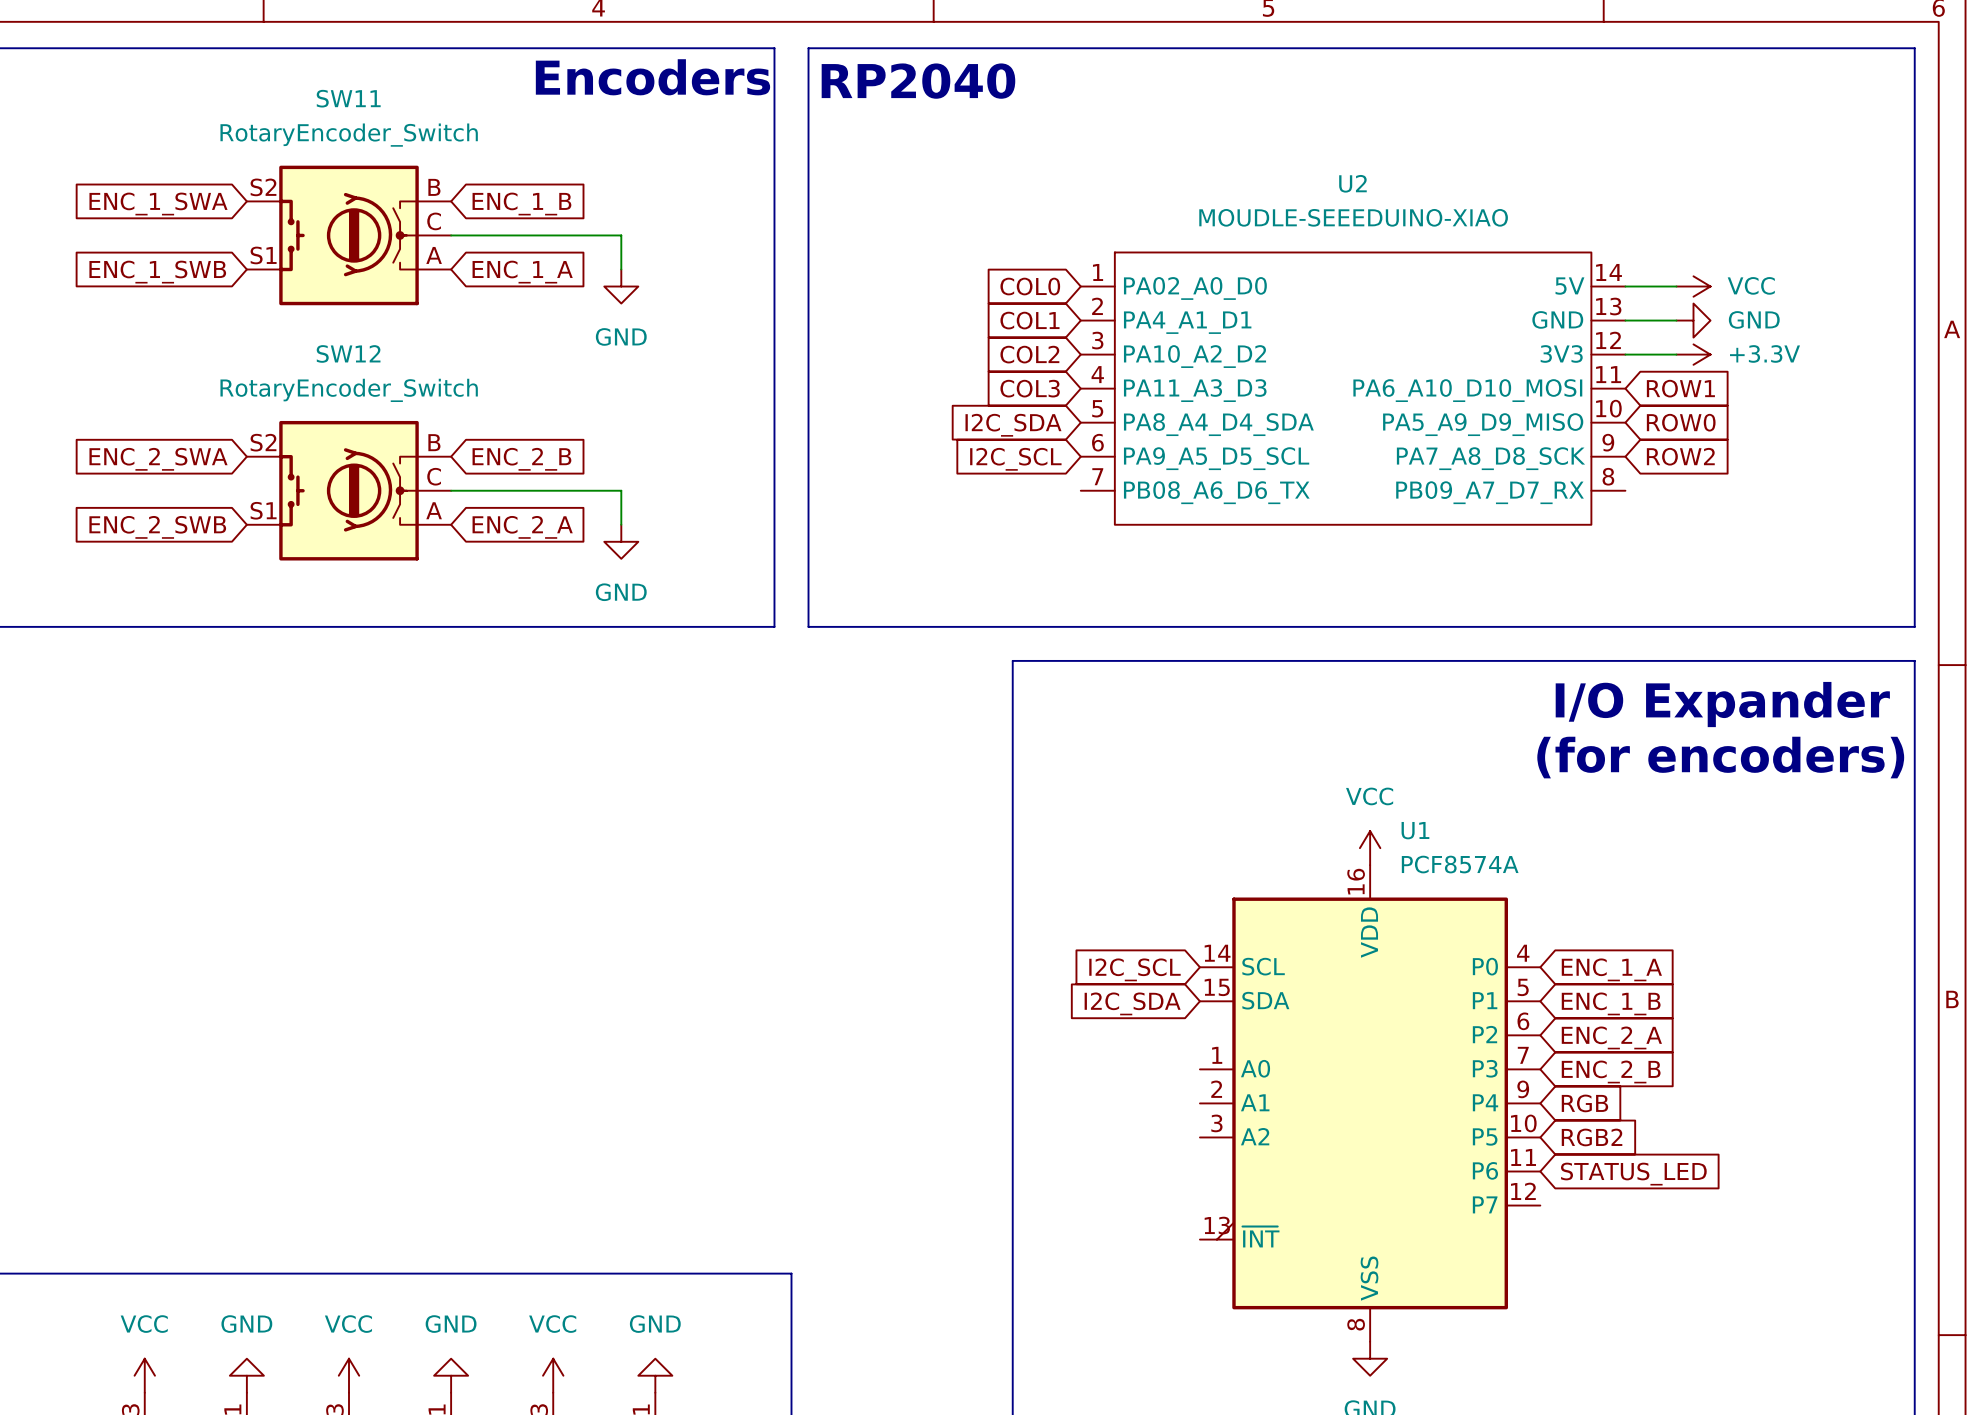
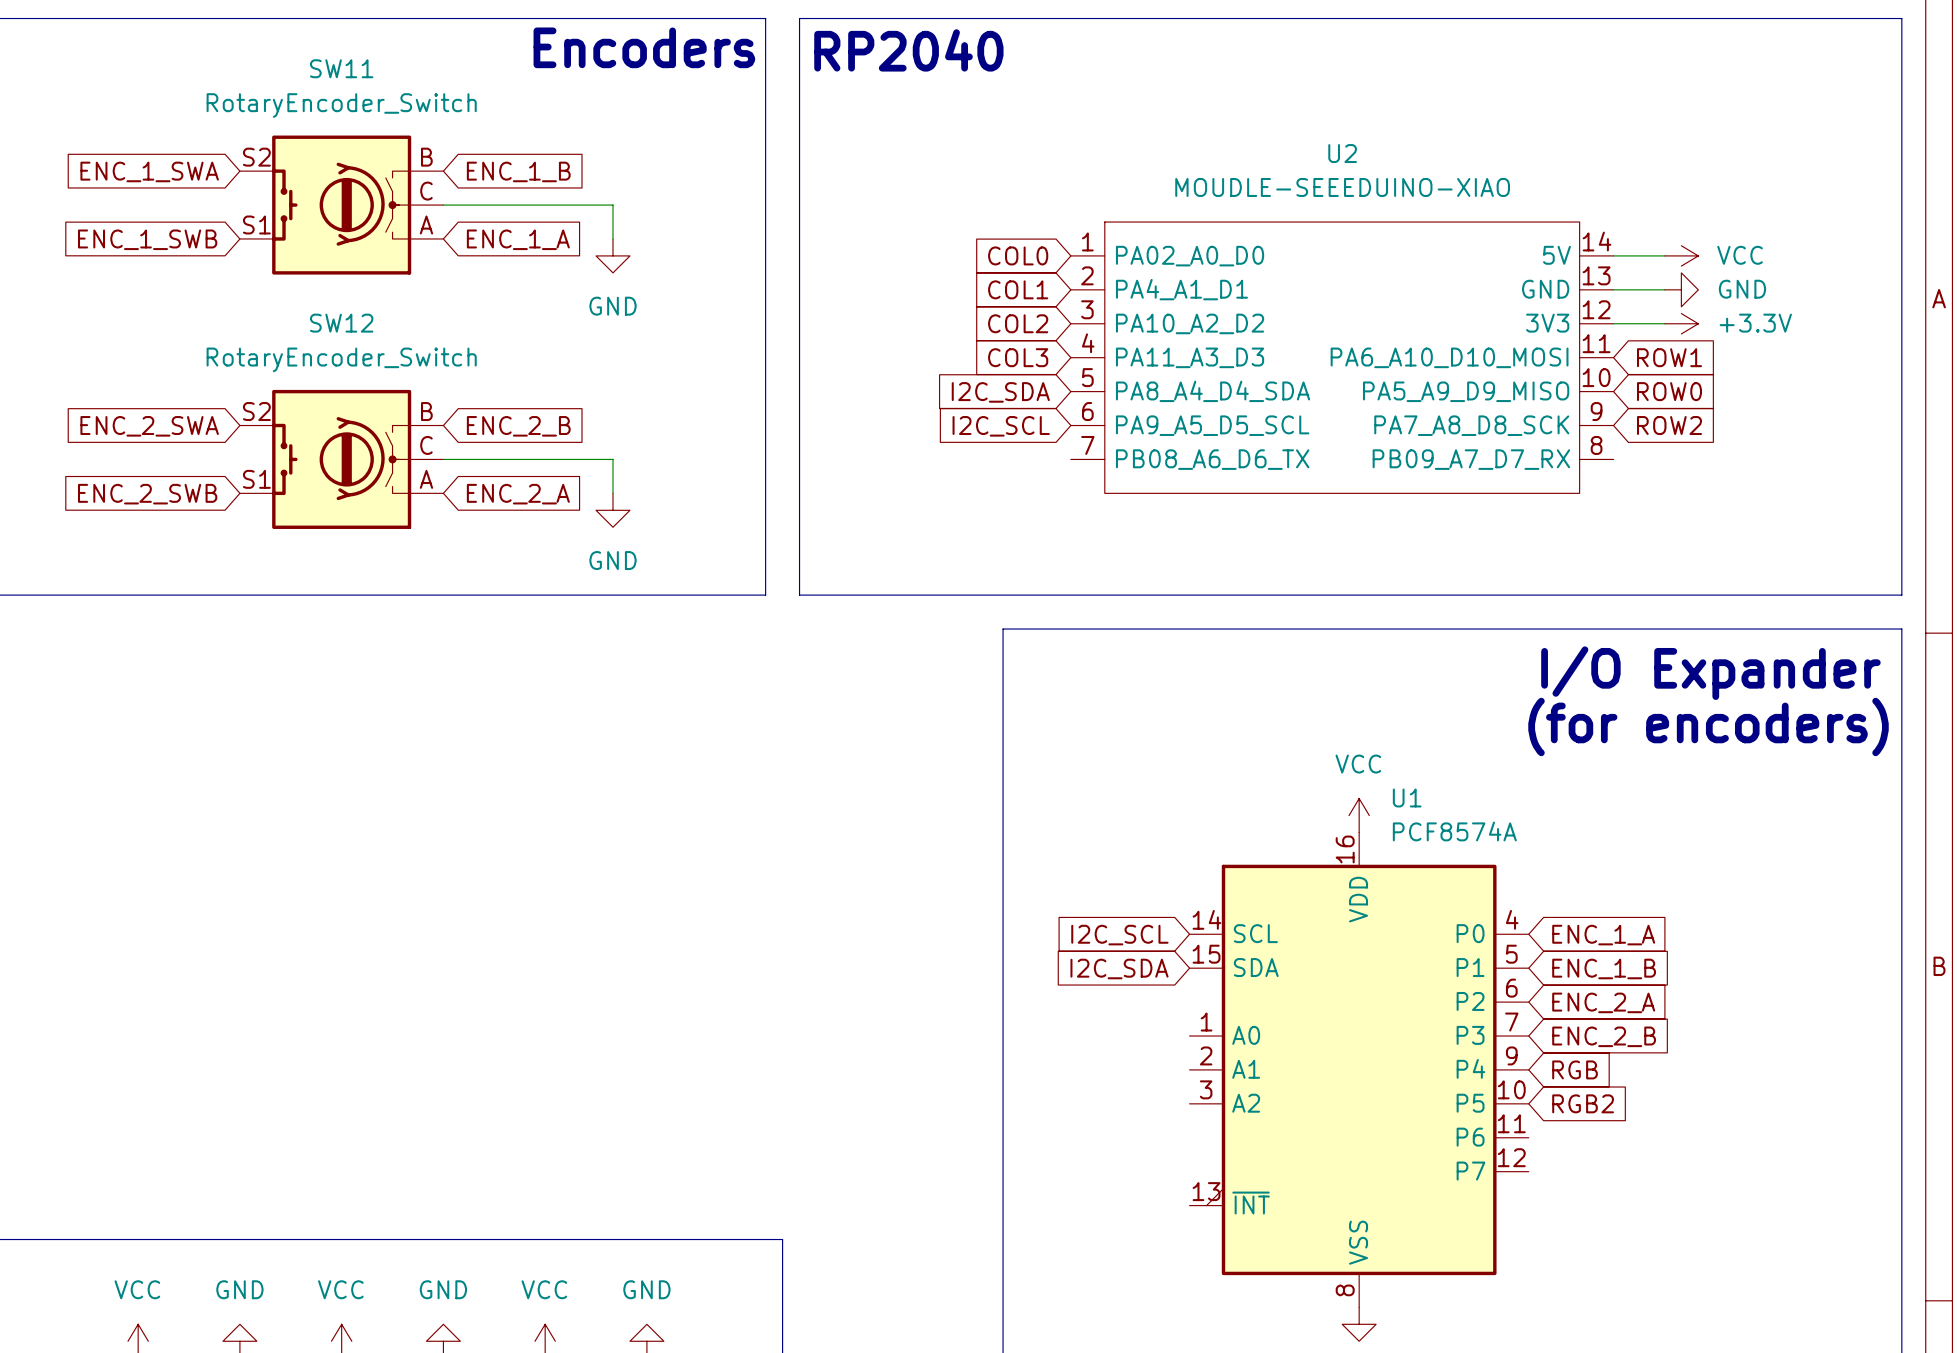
global label: STATUS_LED (1633, 1174) -> none

